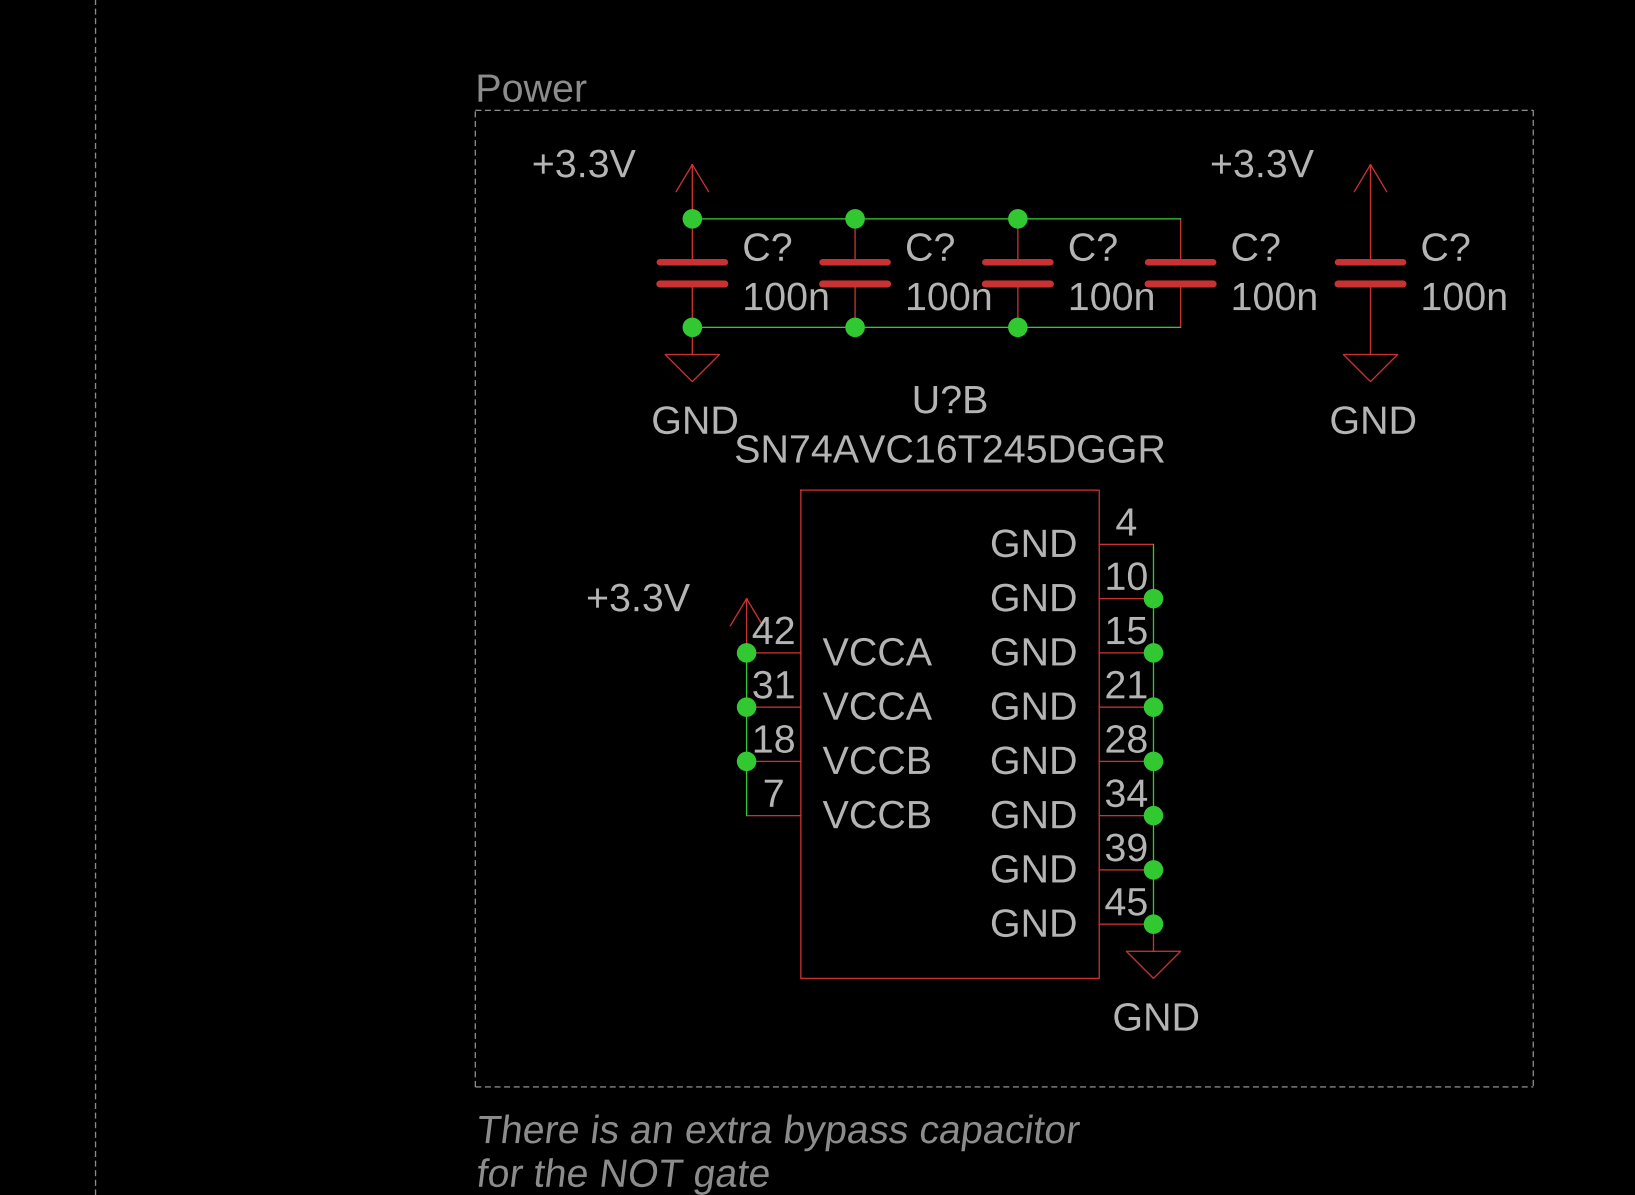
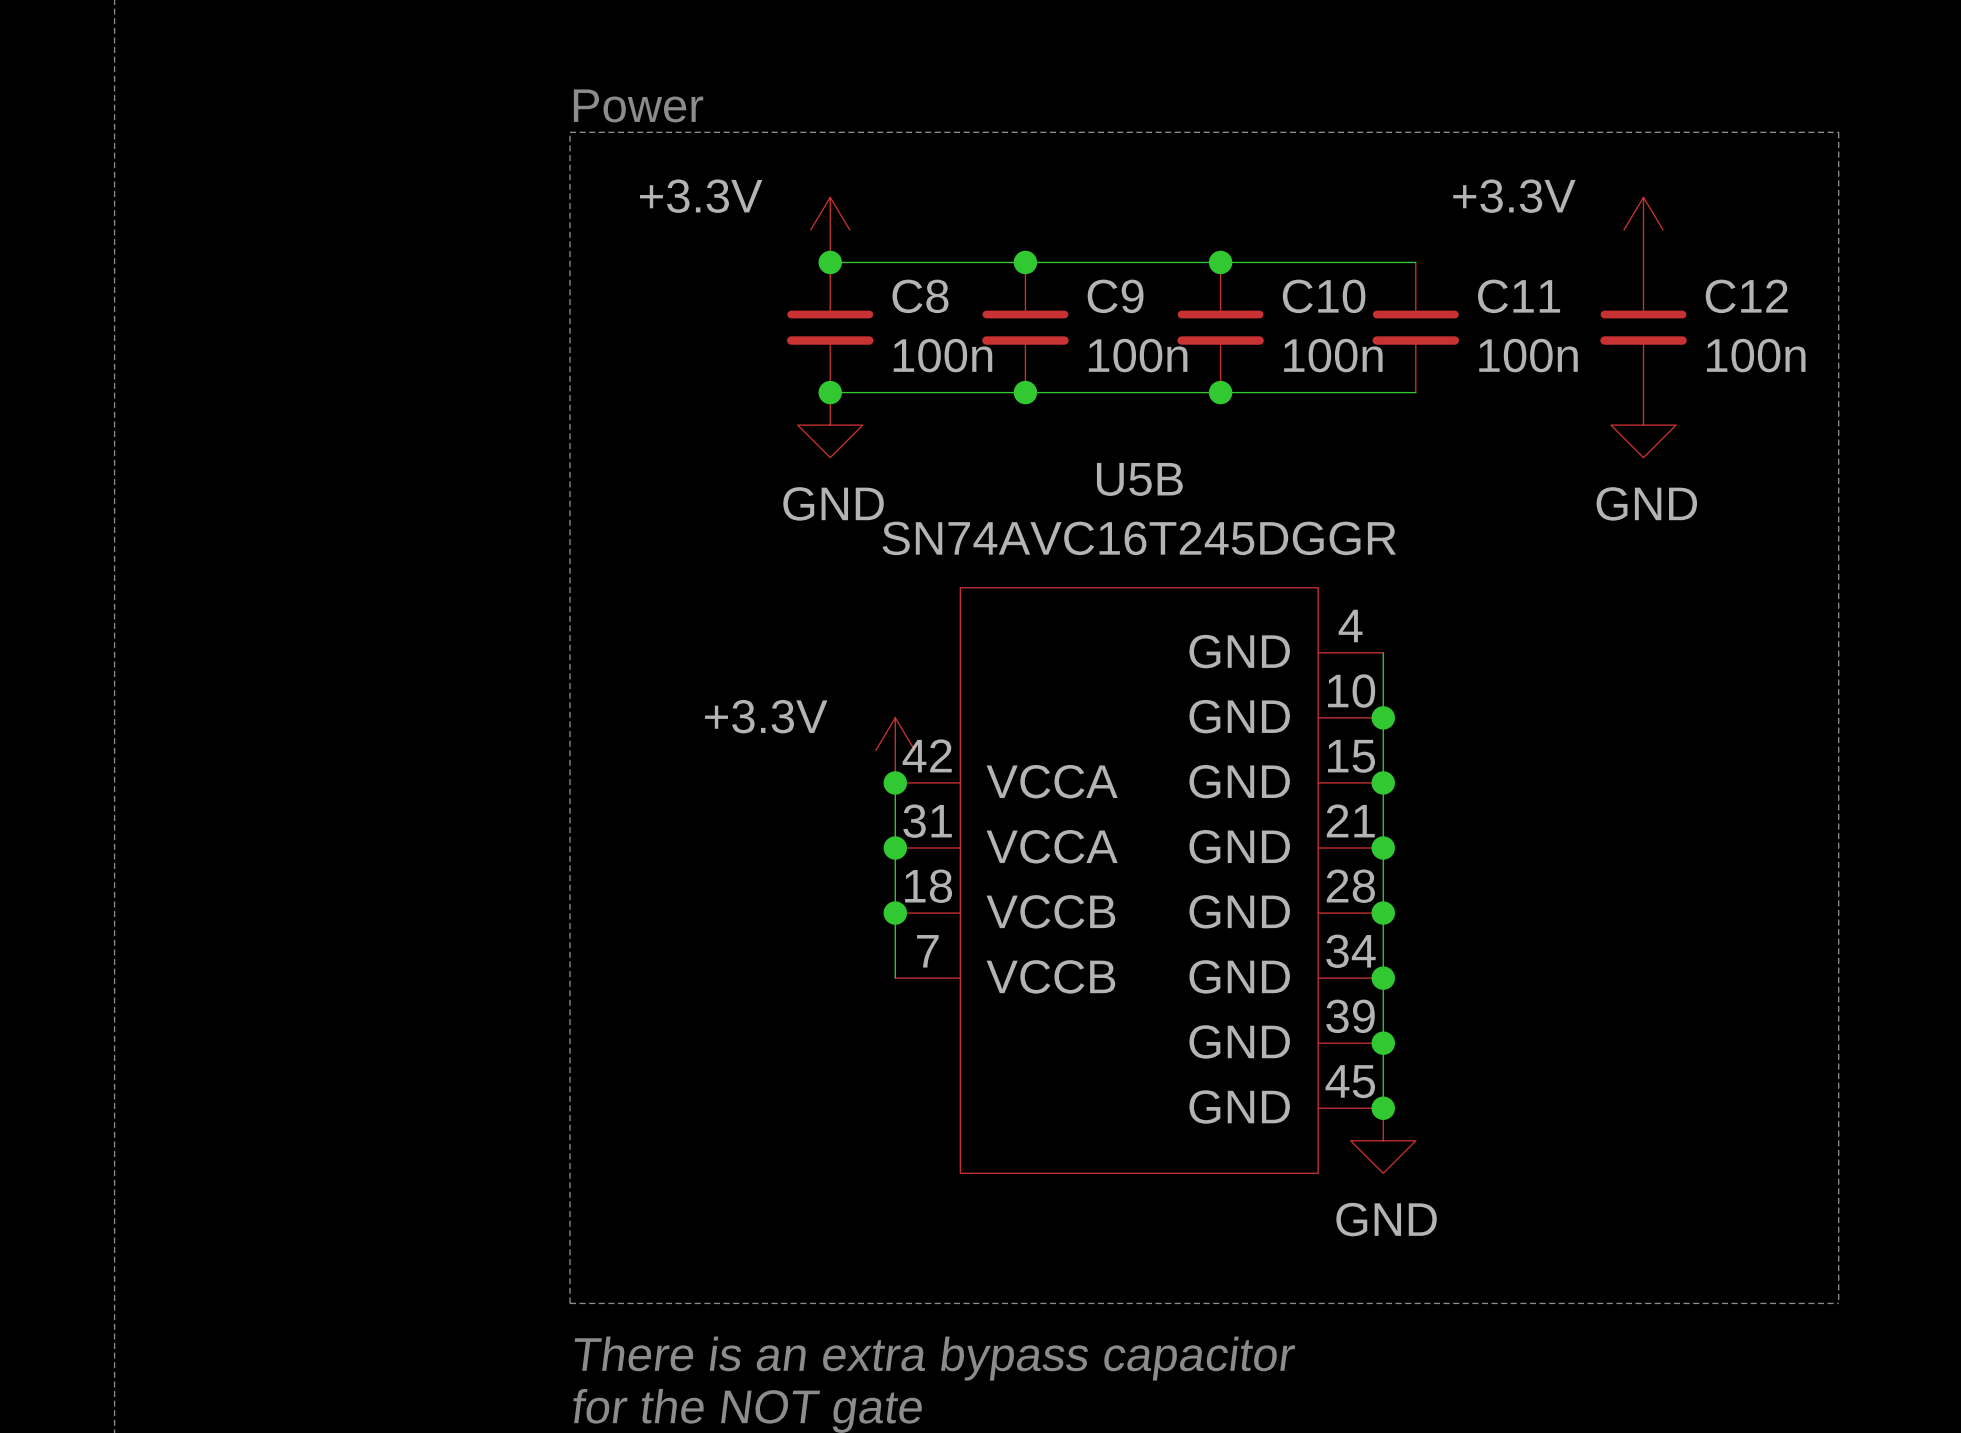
C? name: C? (767, 247) -> C8 (920, 296)
C? name: C? (930, 247) -> C9 (1115, 296)
C? name: C? (1093, 247) -> C10 (1324, 296)
C? name: C? (1255, 247) -> C11 (1519, 296)
C? name: C? (1445, 247) -> C12 (1746, 296)
U?B name: U?B (950, 399) -> U5B (1139, 479)

